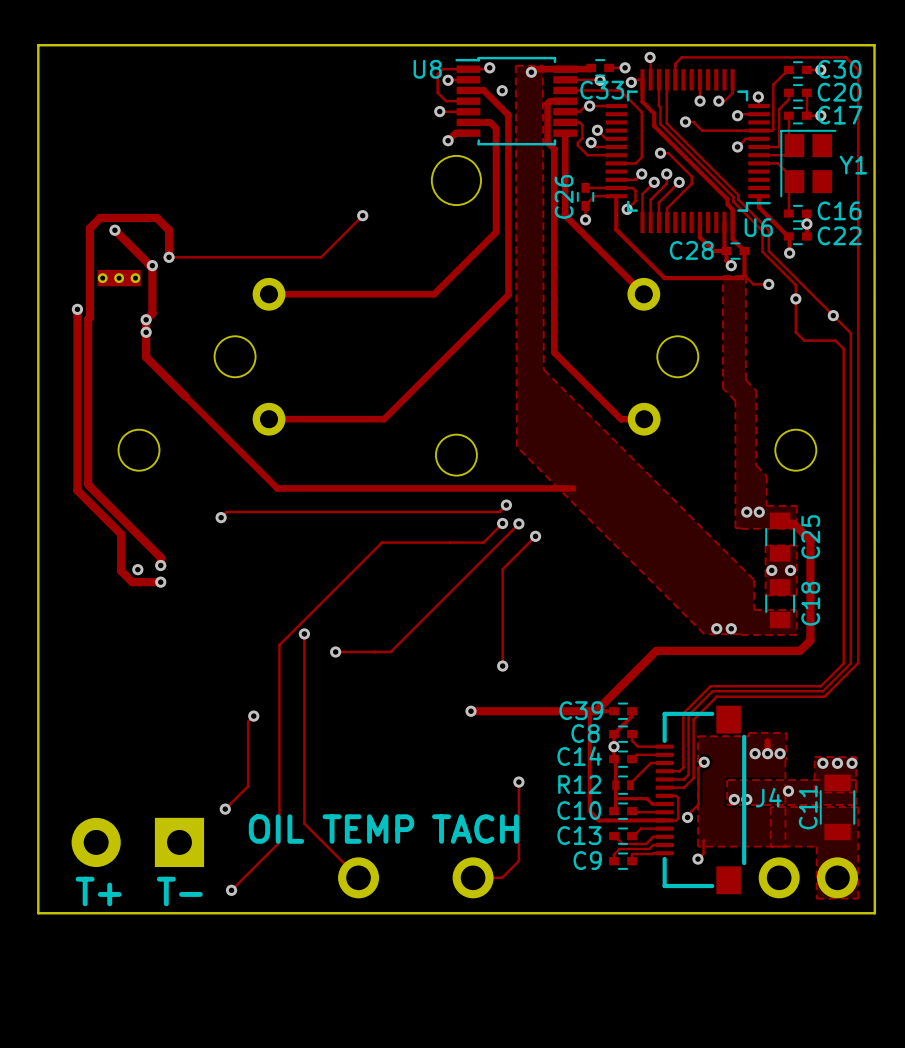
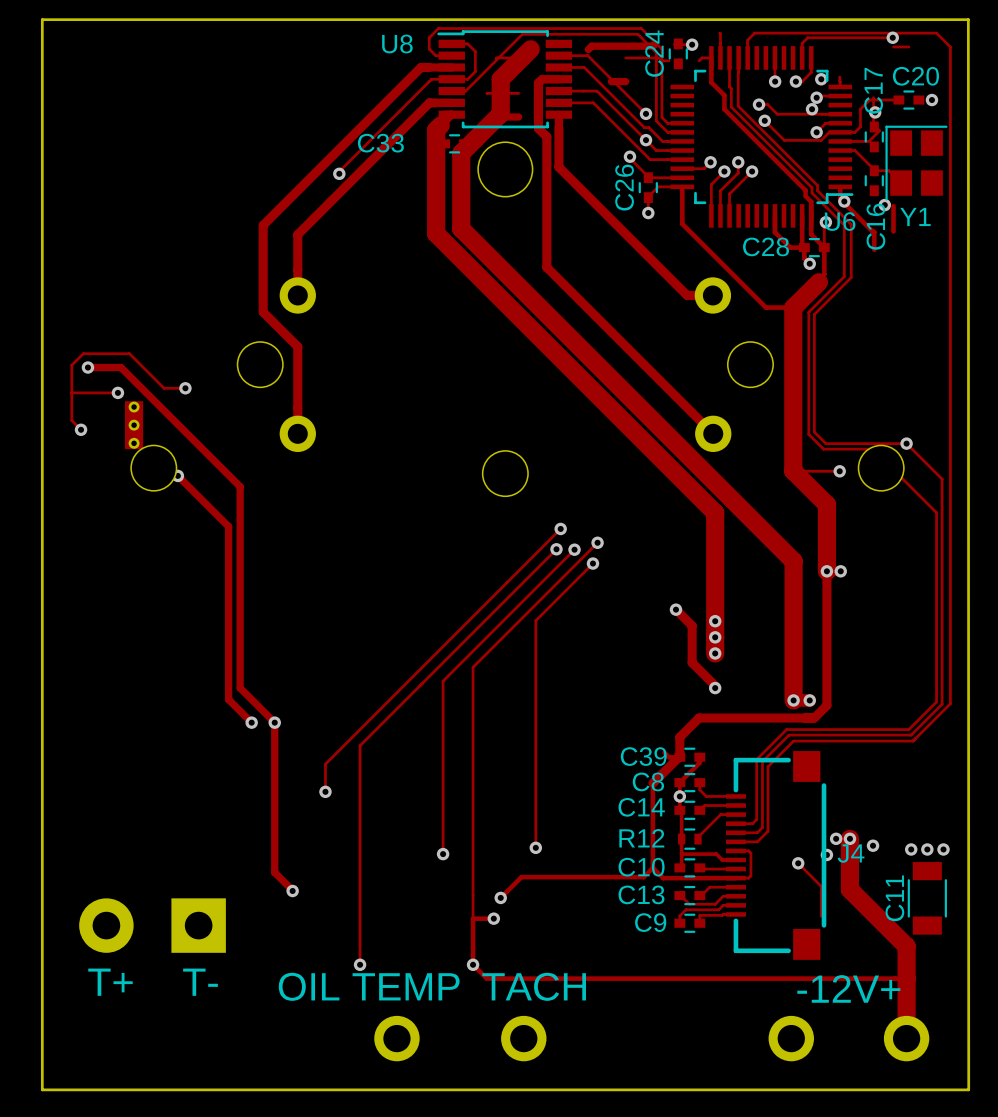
board edge: (874, 45) (874, 913) (38, 913) -> (968, 19) (968, 1089) (42, 1089) (42, 980)
via: (650, 57) -> none
track: none -> (892, 37) (807, 37) (802, 43) (802, 57)
zone outline: (515, 65) (516, 446) (704, 634) (796, 634) (796, 609) (754, 609) (754, 580) (543, 369) (542, 65) (515, 65) -> none
track: none -> (451, 43) (467, 43) (475, 51) (475, 71) (467, 79) (431, 79) (339, 171)
track: (489, 67) (442, 69) (437, 74) (437, 92) (446, 101) (468, 101) -> none
via: (489, 67) -> none
C33 position: (600, 67) -> (454, 143)
U8 name position: U8 (427, 69) -> U8 (397, 44)
track: (788, 69) (773, 84) (773, 129) (758, 130) -> none
C30: (797, 69) -> none
via position: (820, 69) -> (892, 37)
track: none -> (530, 49) (500, 79) (500, 113) (461, 153) (461, 228) (793, 561) (793, 700) (809, 700)
via: (531, 72) -> none
C24: none -> (678, 53)
track: none -> (558, 55) (587, 55) (646, 113)
via: (448, 80) -> none
via: (600, 80) -> none
via: (631, 82) -> none
track: (468, 90) (483, 90) (508, 115) (508, 294) (384, 419) (269, 419) -> (451, 67) (421, 67) (263, 225) (263, 312) (297, 346) (297, 433)
via: (502, 90) -> none
track: (565, 90) (620, 90) (641, 112) (641, 157) (635, 163) (616, 163) -> (558, 91) (596, 91) (656, 150) (682, 150)
C33 name position: C33 (602, 90) -> C33 (380, 143)
track: (788, 92) (788, 99) (779, 109) (779, 147) (772, 147) -> (898, 100) (869, 100) (860, 109) (860, 126) (854, 132)
C20 position: (797, 92) -> (908, 100)
track: (806, 92) (806, 115) (820, 115) -> none
C20 name position: C20 (839, 92) -> C20 (915, 76)
via position: (758, 96) -> (821, 79)
U8 position: (516, 101) -> (504, 79)
track: (549, 101) (547, 103) (547, 142) (554, 149) (554, 352) (620, 419) (644, 419) -> (558, 79) (542, 79) (538, 83) (538, 128) (546, 136) (546, 267) (713, 433)
via: (589, 106) -> none
track: (616, 106) (585, 106) (579, 111) (565, 111) -> none
via: (439, 111) -> none
C17 rotation: 0° (797, 115) -> 90° clockwise (874, 136)
C17 position: (797, 115) -> (874, 136)
via: (820, 115) -> none
C17 name position: C17 (839, 115) -> C17 (873, 90)
via: none -> (931, 100)
track: none -> (558, 102) (593, 102) (650, 159) (682, 159)
track: (468, 122) (490, 122) (495, 128) (495, 232) (434, 294) (269, 294) -> (451, 102) (429, 102) (297, 234) (297, 295)
track: (565, 122) (579, 122) (582, 125) (582, 138) (577, 145) (587, 155) (598, 155) -> (558, 67) (584, 67) (644, 127) (648, 127) (662, 141)
via: none -> (812, 109)
via: none -> (875, 112)
via: none -> (646, 113)
track: (597, 130) (605, 138) -> (451, 55) (435, 55) (429, 49) (429, 37) (438, 28) (641, 28) (661, 49) (661, 117) (667, 123) (670, 123)
via: (597, 130) -> none
track: none -> (451, 114) (436, 130) (436, 233) (715, 512) (715, 653)
track: (565, 133) (564, 215) (643, 294) -> (558, 114) (558, 167) (687, 295) (712, 295)
track: none -> (764, 120) (784, 140) (821, 140) (829, 132) (840, 132)
via: (448, 140) -> none
track: (591, 142) (596, 147) (603, 147) -> (451, 91) (465, 91) (522, 34) (637, 34) (656, 52) (656, 121) (667, 132)
via: (591, 142) -> none
track: (660, 153) (668, 153) (691, 176) (691, 183) (667, 208) (667, 222) -> none
via position: (660, 153) -> (764, 120)
via: none -> (646, 140)
track: (772, 163) (777, 163) (794, 180) (788, 187) (788, 213) -> (855, 150) (874, 170) (888, 170) (901, 183)
Y1 position: (808, 163) -> (916, 163)
Y1 name position: Y1 (853, 165) -> Y1 (915, 216)
track: none -> (629, 156) (648, 177)
via: none -> (629, 156)
track: (616, 188) (632, 188) (635, 190) (635, 201) (627, 209) -> none
via: (627, 209) -> none
via: none -> (844, 201)
C16 rotation: 0° (797, 213) -> 90° clockwise (874, 180)
C16 position: (797, 213) -> (874, 180)
track: (362, 215) (321, 257) (169, 257) (169, 230) (156, 218) (100, 218) (89, 228) (88, 484) (160, 557) (160, 565) -> none
via position: (362, 215) -> (339, 173)
via position: (806, 223) -> (884, 205)
track: none -> (825, 222) (824, 247)
via: none -> (825, 222)
track: (114, 230) (152, 265) (152, 313) (146, 319) -> none
via: (114, 230) -> none
C22: (797, 236) -> none
track: (762, 251) (795, 285) (795, 332) (804, 340) (835, 340) (843, 348) (843, 663) -> (844, 248) (844, 276) (808, 312) (808, 434) (823, 449) (872, 449) (936, 512) (936, 701) (934, 704)
track: (768, 251) (850, 333) (850, 460) -> (851, 247) (851, 277) (814, 314) (814, 432) (825, 443) (906, 443) (942, 479)
via: (789, 253) -> none
via: (169, 257) -> none
via: (152, 265) -> none
track: (744, 275) (753, 284) (768, 284) -> none
zone outline: (722, 276) (722, 388) (735, 400) (735, 528) (796, 528) (796, 505) (766, 505) (766, 475) (756, 465) (756, 390) (745, 380) (745, 276) (722, 276) -> none
part rotation: 0° (119, 278) -> 90° clockwise (134, 425)
part position: (119, 278) -> (134, 425)
track: (664, 278) (741, 278) -> (735, 277) (765, 307) (793, 307)
track: none -> (818, 282) (793, 307) (793, 470) (826, 504) (826, 571)
via: (768, 284) -> none
via: (795, 298) -> none
track: (77, 309) (77, 490) (121, 534) (121, 571) (132, 582) (160, 582) -> none
via: (77, 309) -> none
via: (833, 315) -> none
track: (146, 319) (146, 357) (277, 488) (573, 488) -> none
via: (146, 319) -> none
via: (146, 332) -> none
track: none -> (87, 367) (120, 367) (240, 486) (240, 688) (274, 722) (274, 872) (292, 890)
via: none -> (87, 367)
track: none -> (185, 388) (164, 388) (129, 353) (83, 353) (71, 365) (71, 420) (81, 429)
via: none -> (185, 388)
track: none -> (71, 392) (117, 392)
via: none -> (117, 392)
via: none -> (81, 429)
via: none -> (906, 443)
track: none -> (793, 471) (839, 471)
via: none -> (839, 471)
track: none -> (177, 475) (228, 526) (228, 699) (251, 722)
via: none -> (177, 475)
track: (499, 511) (226, 511) (221, 517) -> (553, 536) (325, 764) (325, 791)
via: (746, 512) -> none
via: (759, 512) -> none
via: (221, 517) -> none
track: none -> (597, 542) (473, 667) (473, 918)
via: none -> (597, 542)
track: (780, 520) (785, 523) (793, 523) (810, 540) (810, 640) (800, 650) (656, 650) (631, 675) -> (826, 571) (826, 705) (814, 718) (699, 718)
C25: (780, 537) -> none
track: (483, 542) (381, 542) (279, 645) (279, 842) (231, 890) -> (535, 570) (360, 745) (360, 964)
via: none -> (826, 571)
via: none -> (840, 571)
zone outline: (765, 545) (796, 545) (796, 595) (765, 595) (765, 545) -> none
via: (160, 565) -> none
via: (137, 569) -> none
track: (502, 569) (502, 666) -> (556, 599) (535, 620) (535, 847)
via: (771, 570) -> none
via: (790, 570) -> none
track: none -> (675, 609) (692, 625) (692, 662) (715, 685) (715, 688)
via: none -> (675, 609)
via: (160, 582) -> none
via: none -> (715, 621)
via: none -> (715, 637)
C18: (780, 603) -> none
via: none -> (715, 653)
via: (716, 628) -> none
via: (731, 628) -> none
track: (304, 633) (304, 823) (358, 877) -> none
via: (304, 633) -> none
track: (400, 642) (390, 652) (335, 652) -> (443, 681) (443, 854)
via: none -> (715, 688)
via: (335, 652) -> none
via: none -> (793, 700)
via: none -> (809, 700)
via: (502, 666) -> none
via: none -> (251, 722)
via: none -> (274, 722)
track: (613, 693) (595, 711) (471, 711) -> (679, 737) (679, 757)
via: (471, 711) -> none
track: (589, 711) (589, 734) -> (678, 757) (652, 783)
track: (253, 716) (248, 721) (248, 786) (225, 809) -> none
via: (253, 716) -> none
track: (767, 741) (767, 753) -> none
via: none -> (325, 791)
via: (755, 753) -> none
via: (767, 753) -> none
via: (780, 753) -> none
track: (704, 762) (698, 767) (698, 804) (685, 817) -> none
via: (704, 762) -> none
via: (822, 763) -> none
via: (837, 763) -> none
via: (852, 763) -> none
zone outline: (856, 779) (727, 779) (727, 804) (856, 804) (856, 757) (814, 757) (814, 792) (856, 792) -> none
track: (518, 782) (518, 861) (502, 877) (473, 877) -> none
via position: (518, 782) -> (535, 847)
via: none -> (836, 838)
track: none -> (849, 838) (849, 889) (906, 946) (906, 1038)
via: none -> (849, 838)
via: none -> (911, 849)
via: none -> (927, 849)
via: none -> (943, 849)
via: none -> (443, 854)
via: (734, 799) -> none
track: none -> (798, 863) (821, 886) (821, 916)
via: none -> (798, 863)
C11 position: (837, 807) -> (927, 898)
via: (225, 809) -> none
track: none -> (652, 867) (643, 877) (521, 877) (500, 897)
via: (687, 817) -> none
text position: OIL TEMP (331, 829) -> OIL TEMP (369, 986)
text position: TACH (475, 829) -> TACH (534, 986)
via: none -> (292, 890)
via: none -> (500, 897)
track: (704, 840) (703, 853) (697, 859) -> none
part position: (137, 842) -> (152, 925)
zone outline: (770, 846) (770, 807) (858, 807) (858, 898) (816, 898) (816, 846) (697, 846) (697, 736) (748, 736) (748, 732) (786, 732) (785, 759) (785, 846) -> none
track: none -> (473, 918) (493, 918)
track: none -> (473, 918) (473, 964) (486, 978) (906, 978)
via: none -> (493, 918)
via: (697, 859) -> none
part: (358, 877) -> none
part: (473, 877) -> none
part: (779, 877) -> none
part: (837, 877) -> none
via: (231, 890) -> none
text position: T+ (98, 891) -> T+ (110, 982)
text position: T- (179, 891) -> T- (200, 982)
via: none -> (360, 964)
via: none -> (473, 964)
text: none -> -12V+ (848, 988)
part: none -> (396, 1038)
part: none -> (523, 1038)
part: none -> (791, 1038)
part: none -> (906, 1038)

